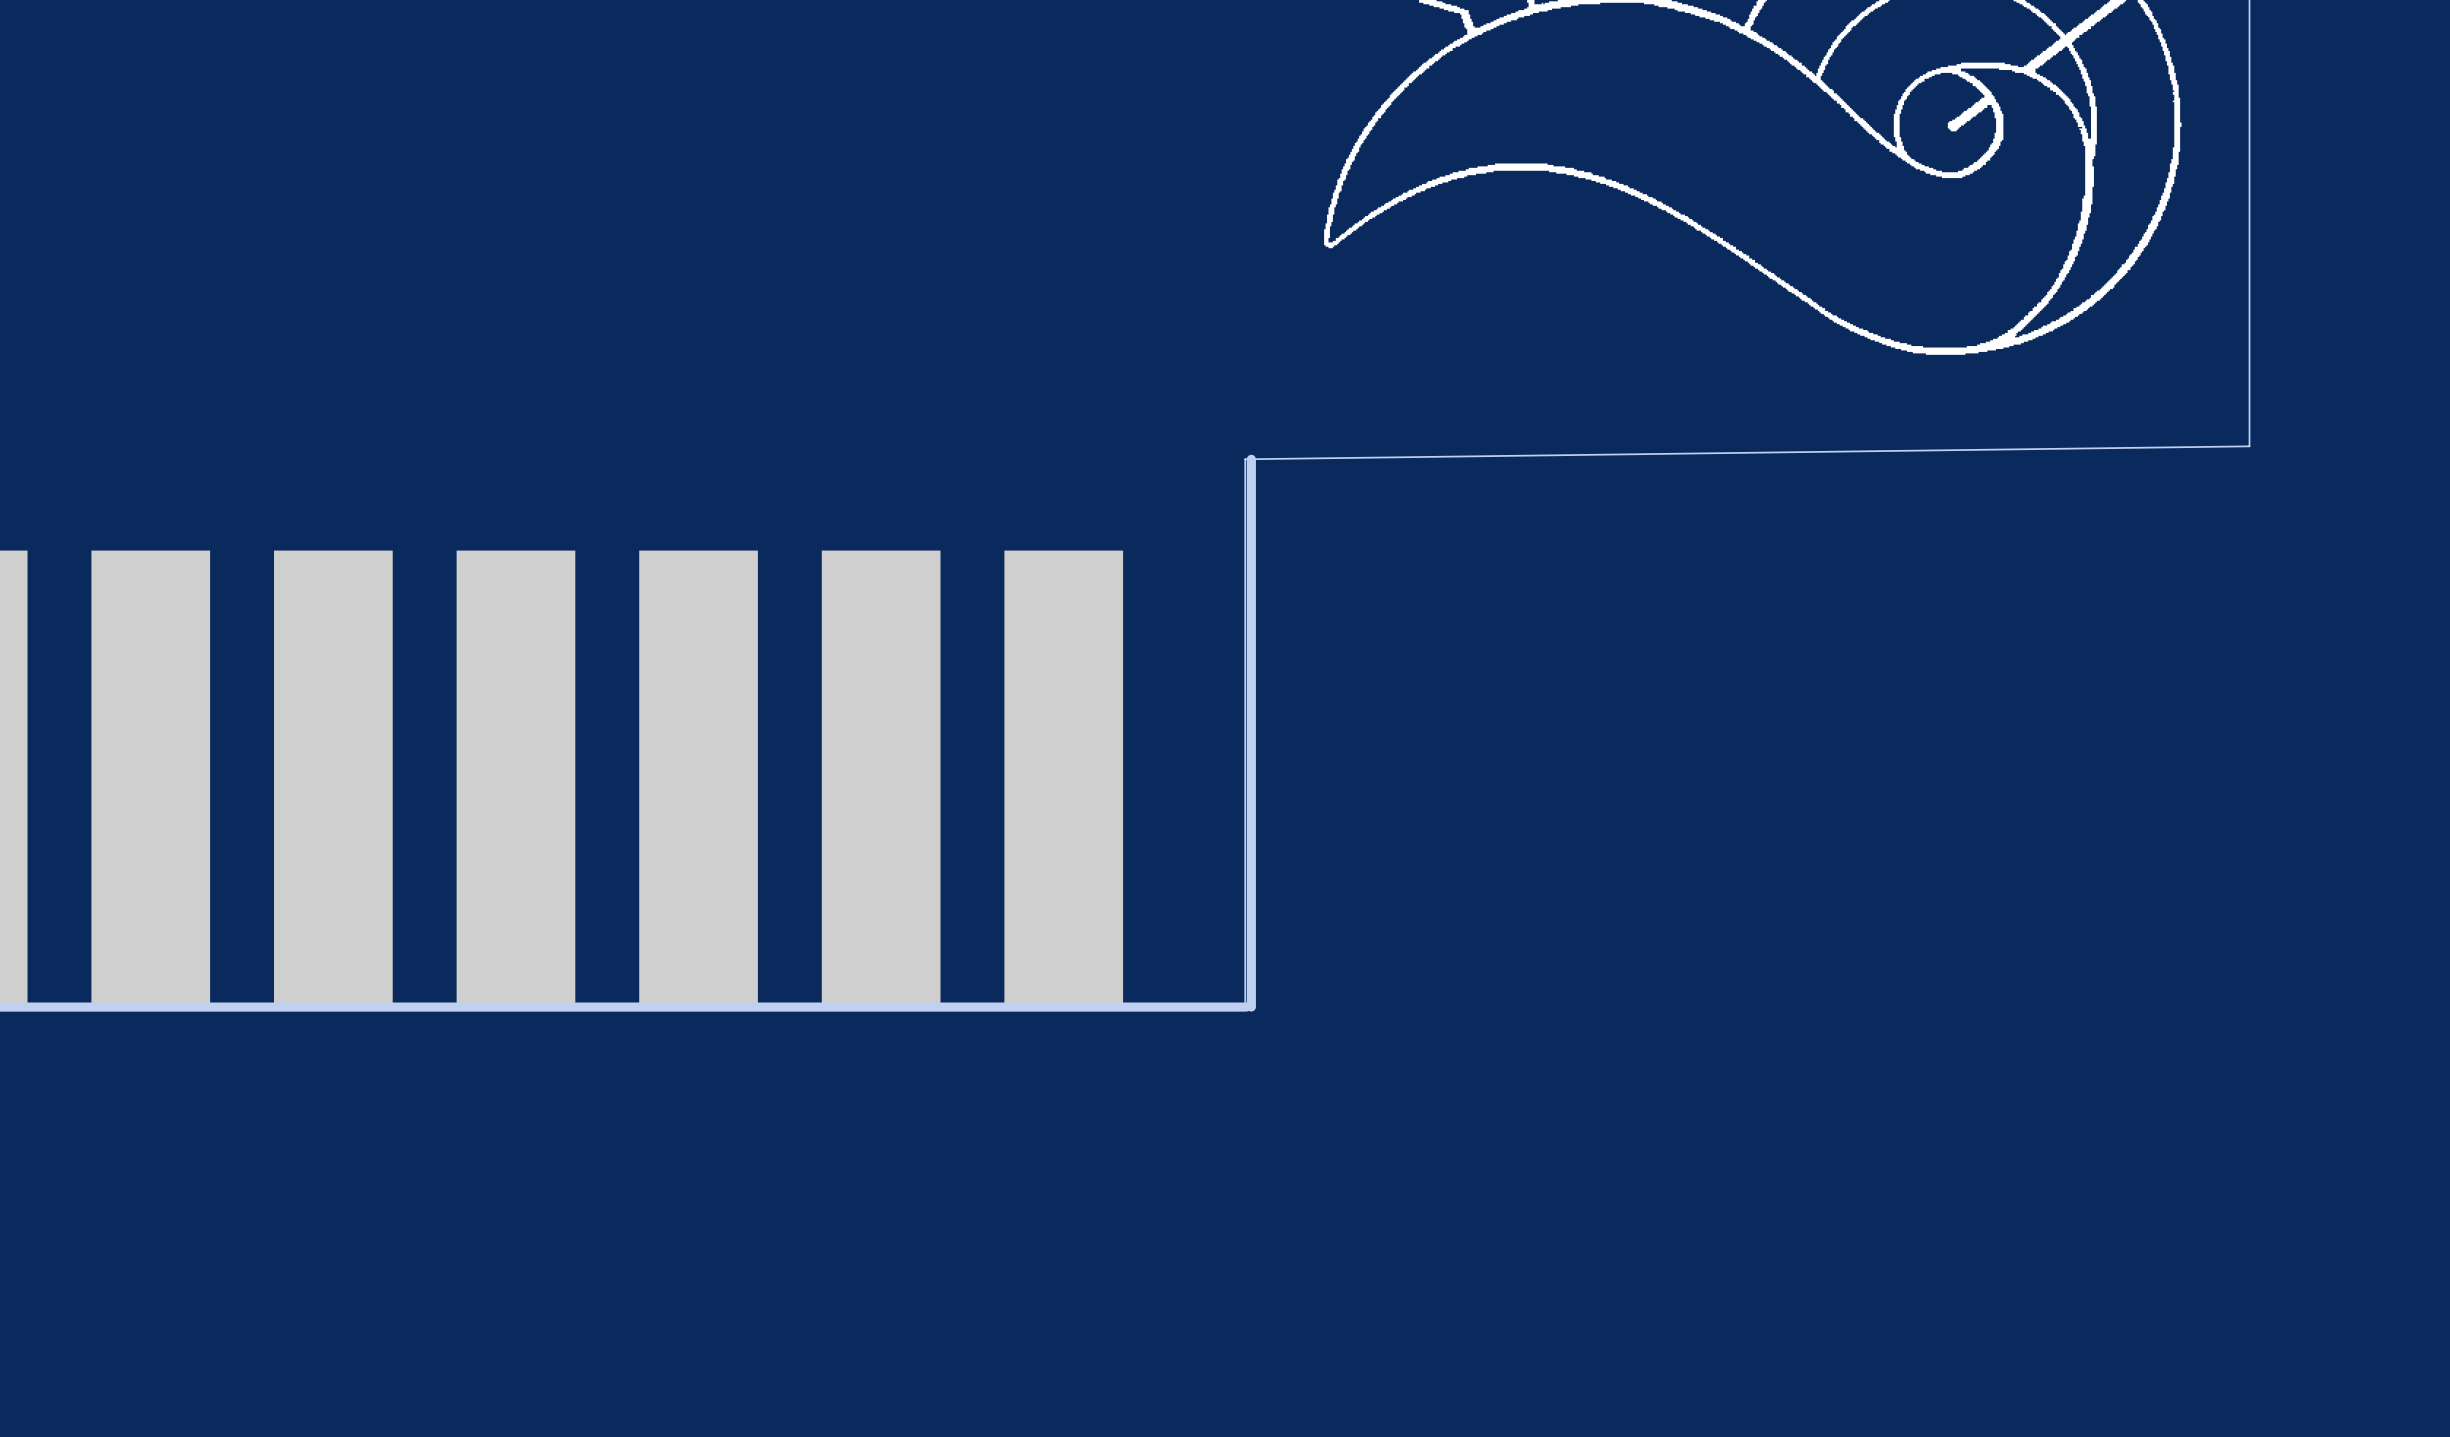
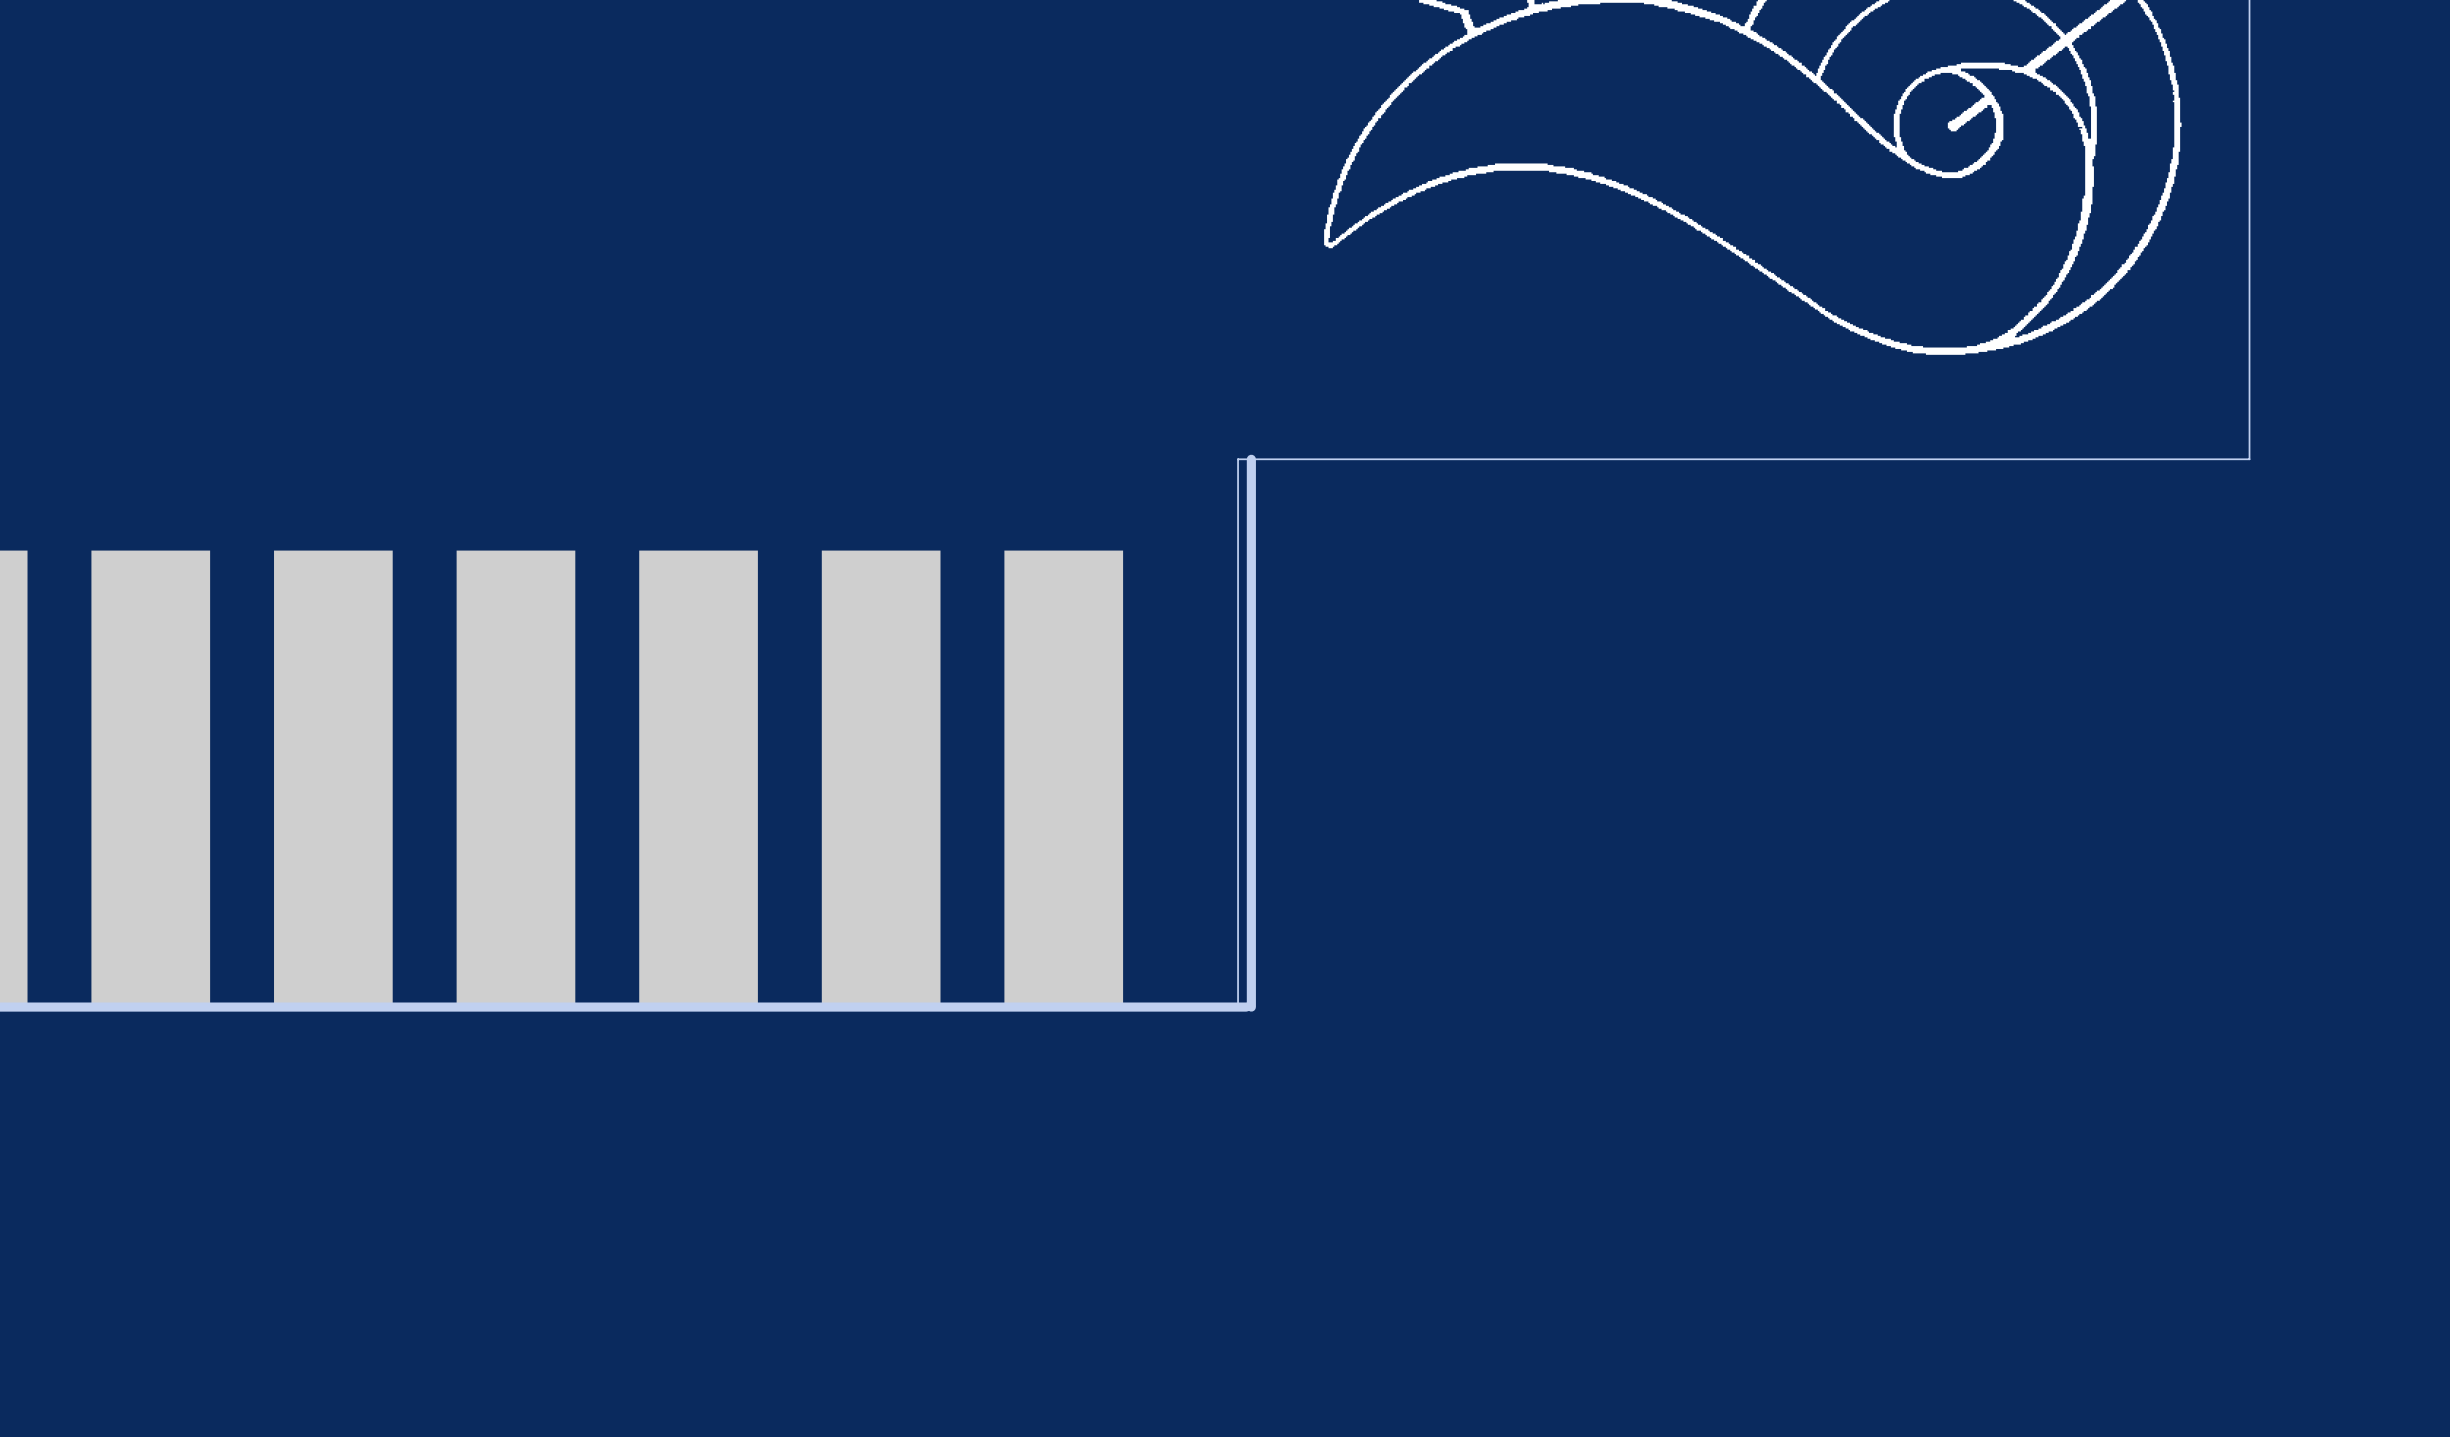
board edge: (2249, 446) (1245, 459) (1245, 1007) (1238, 1007) -> (2249, 446) (2249, 459) (1238, 459) (1238, 1007)

